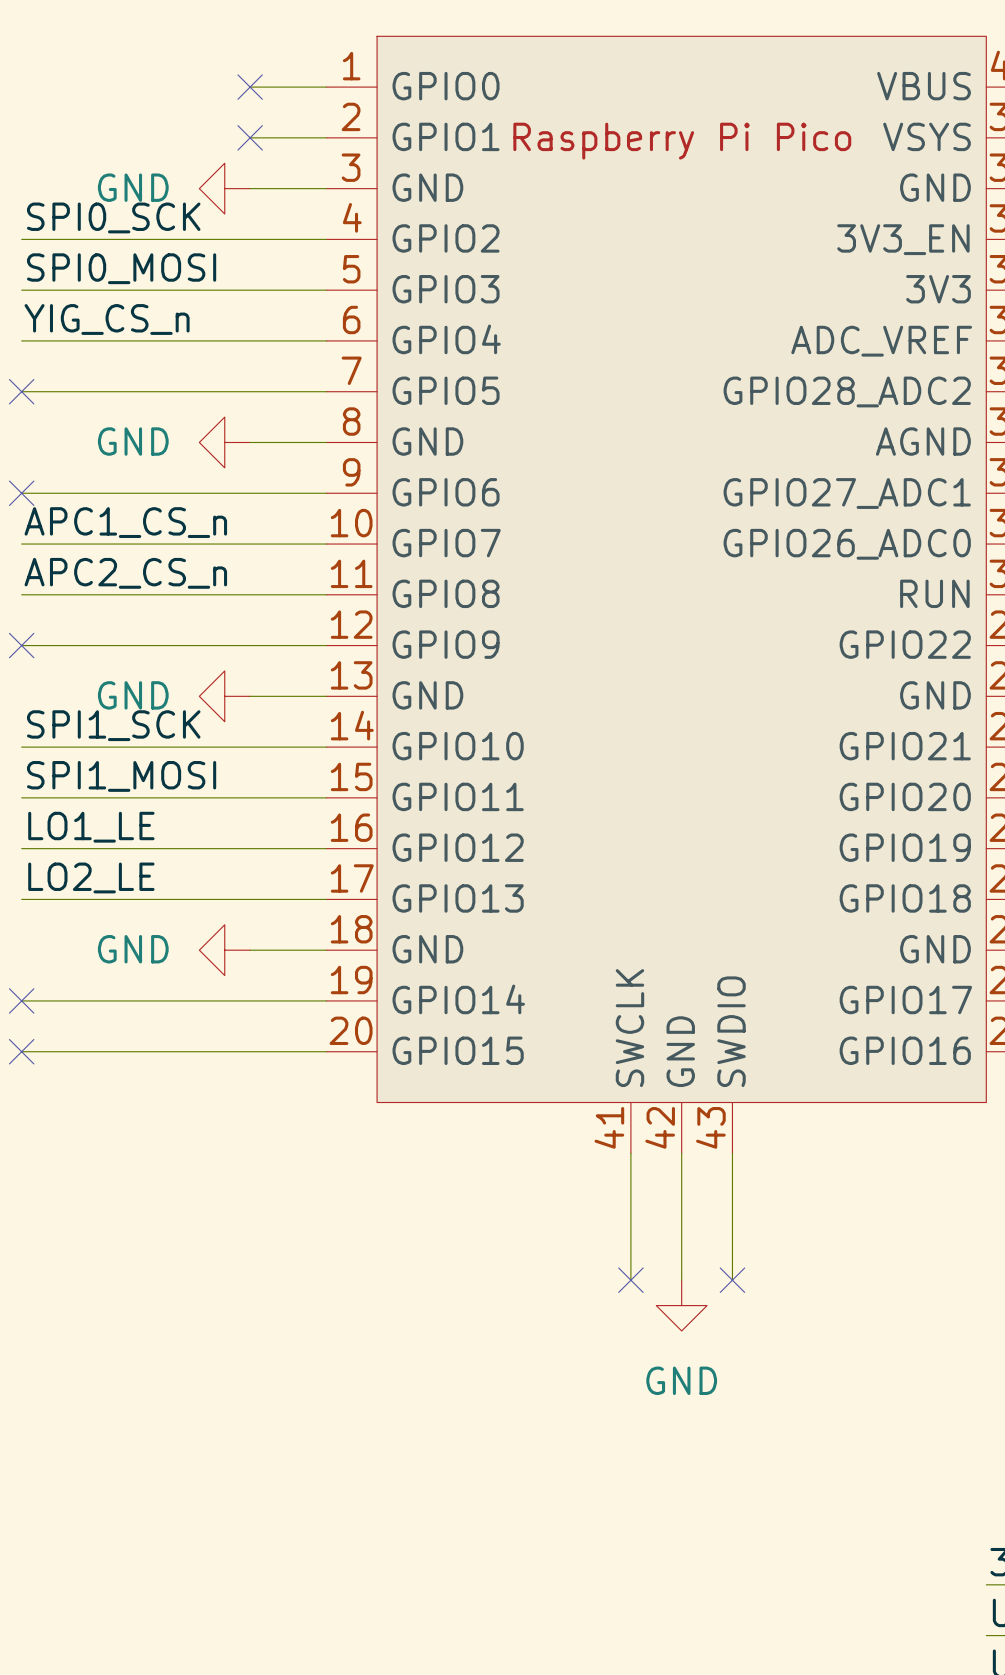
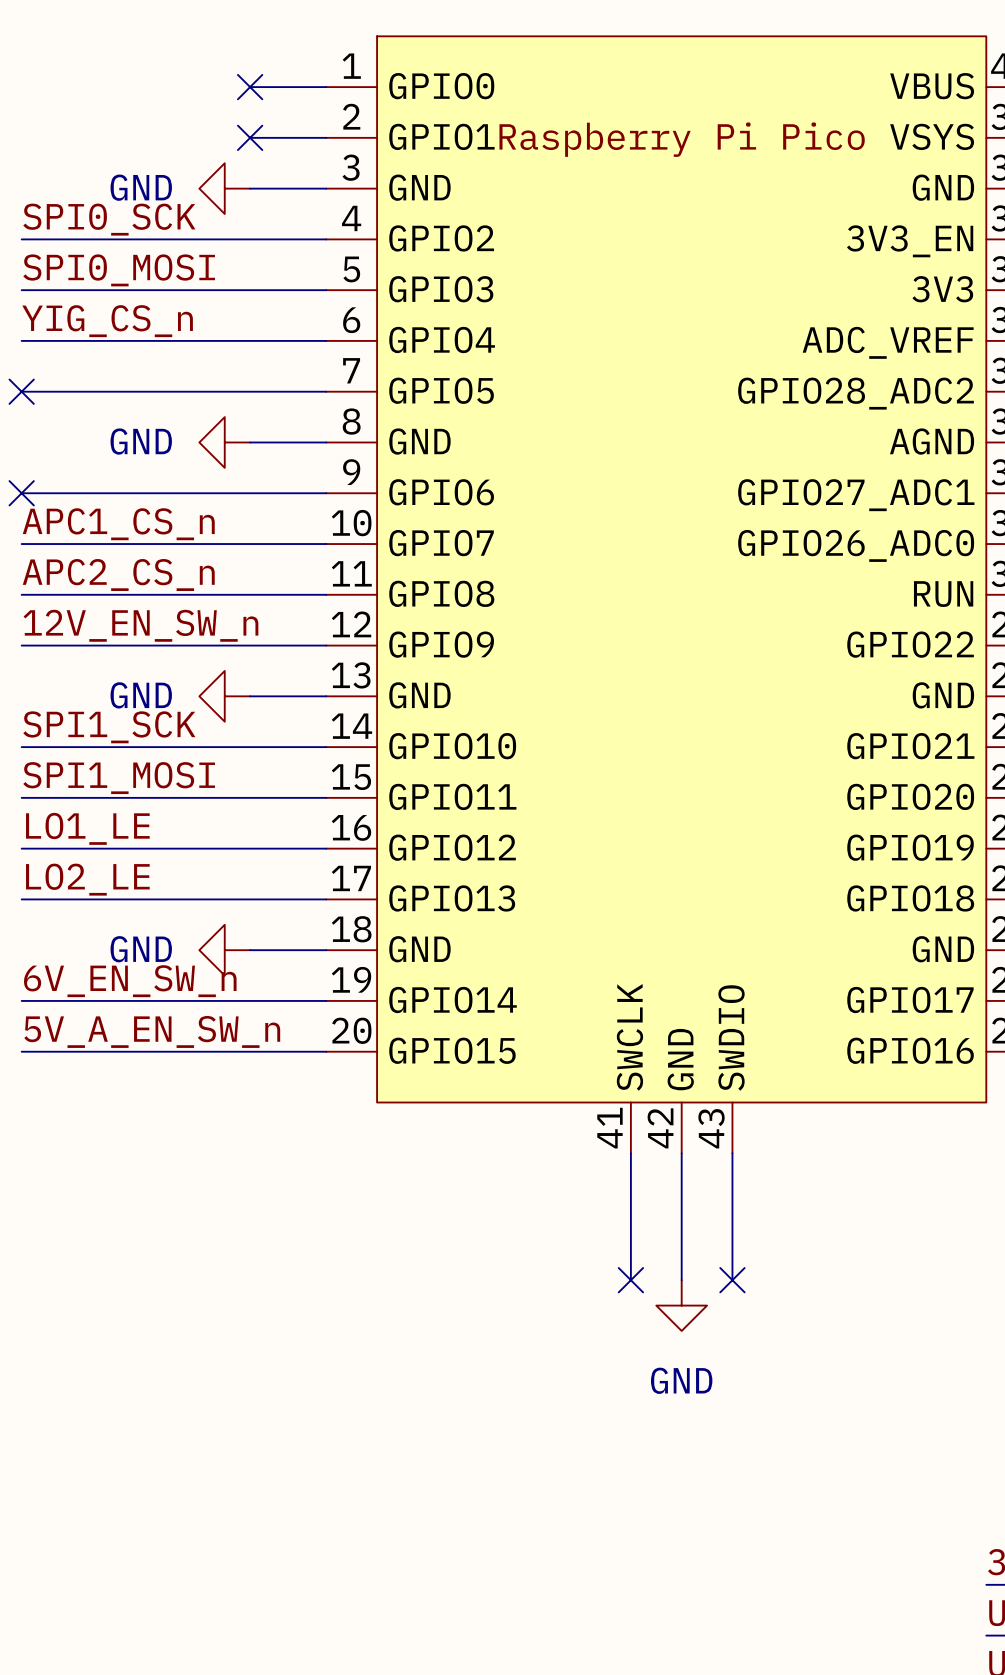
label: none -> 12V_EN_SW_n (140, 625)
no-connect mark: (21, 645) -> none
label: none -> 6V_EN_SW_n (130, 981)
no-connect mark: (21, 1000) -> none
label: none -> 5V_A_EN_SW_n (152, 1031)
no-connect mark: (21, 1051) -> none

